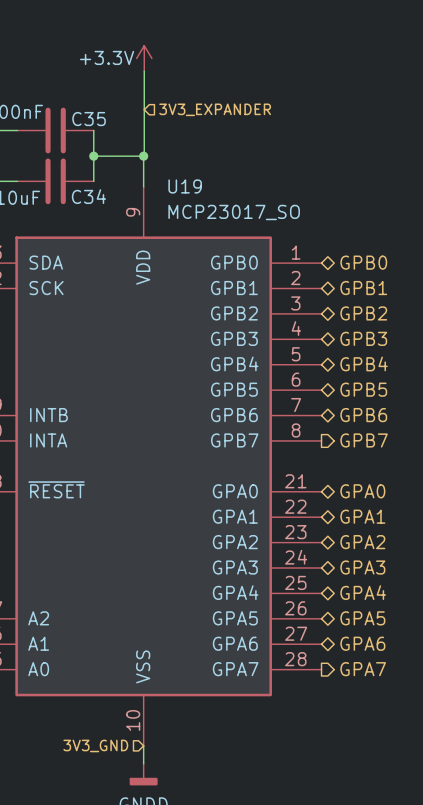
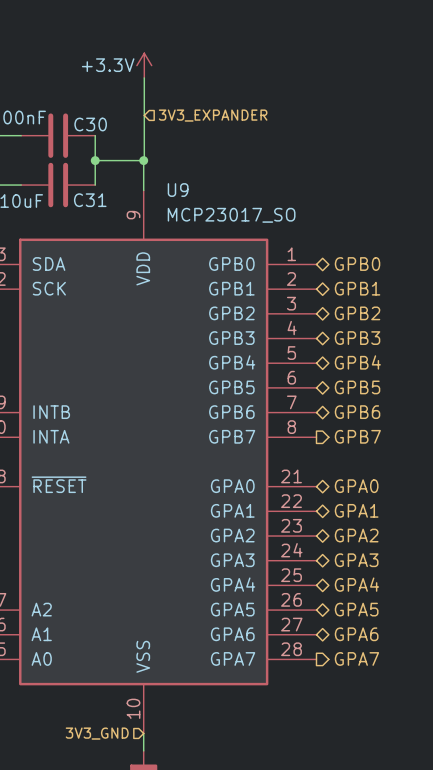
C35 name: C35 (89, 119) -> C30 (90, 124)
U19 name: U19 (185, 186) -> U9 (178, 190)
C34 name: C34 (88, 196) -> C31 (90, 200)

